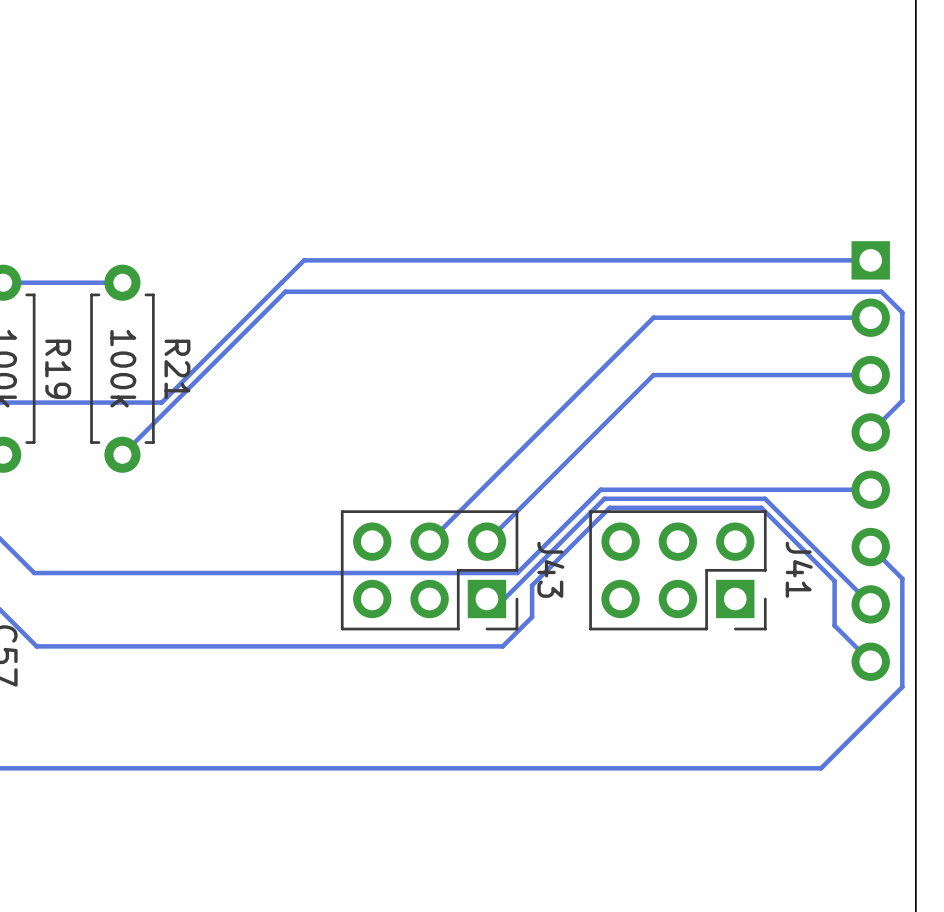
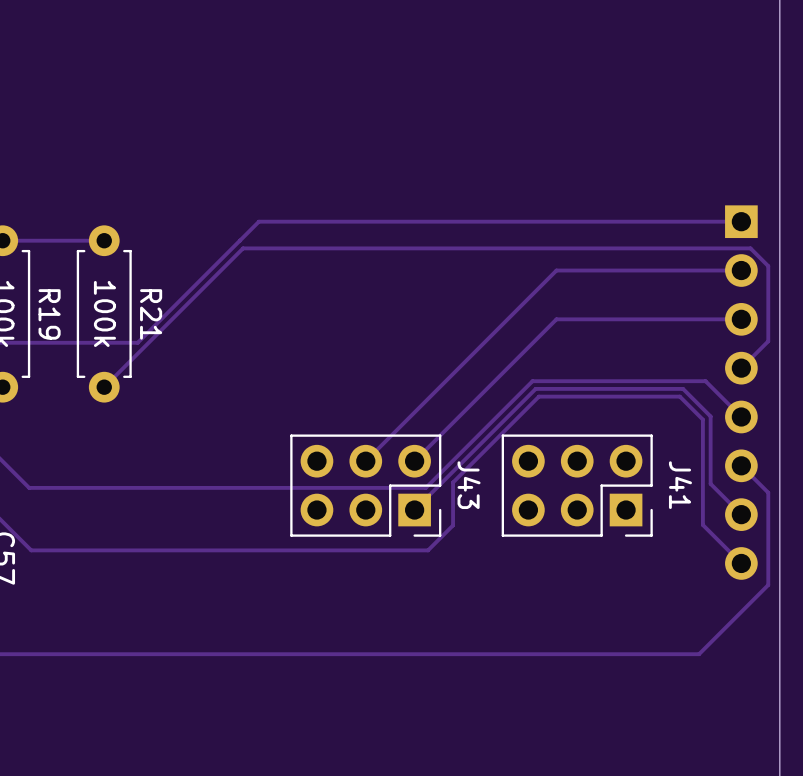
track: (870, 489) (600, 489) (517, 573) (500, 573) -> (741, 416) (705, 381) (532, 381) (425, 487)
track: (834, 568) (765, 498) (604, 498) (504, 599) (486, 599) -> (710, 483) (710, 416) (683, 388) (535, 388) (414, 510)
track: (532, 585) (609, 507) (761, 507) (834, 581) (834, 625) -> (453, 498) (453, 482) (538, 396) (679, 396) (702, 419) (702, 525) (710, 532)

